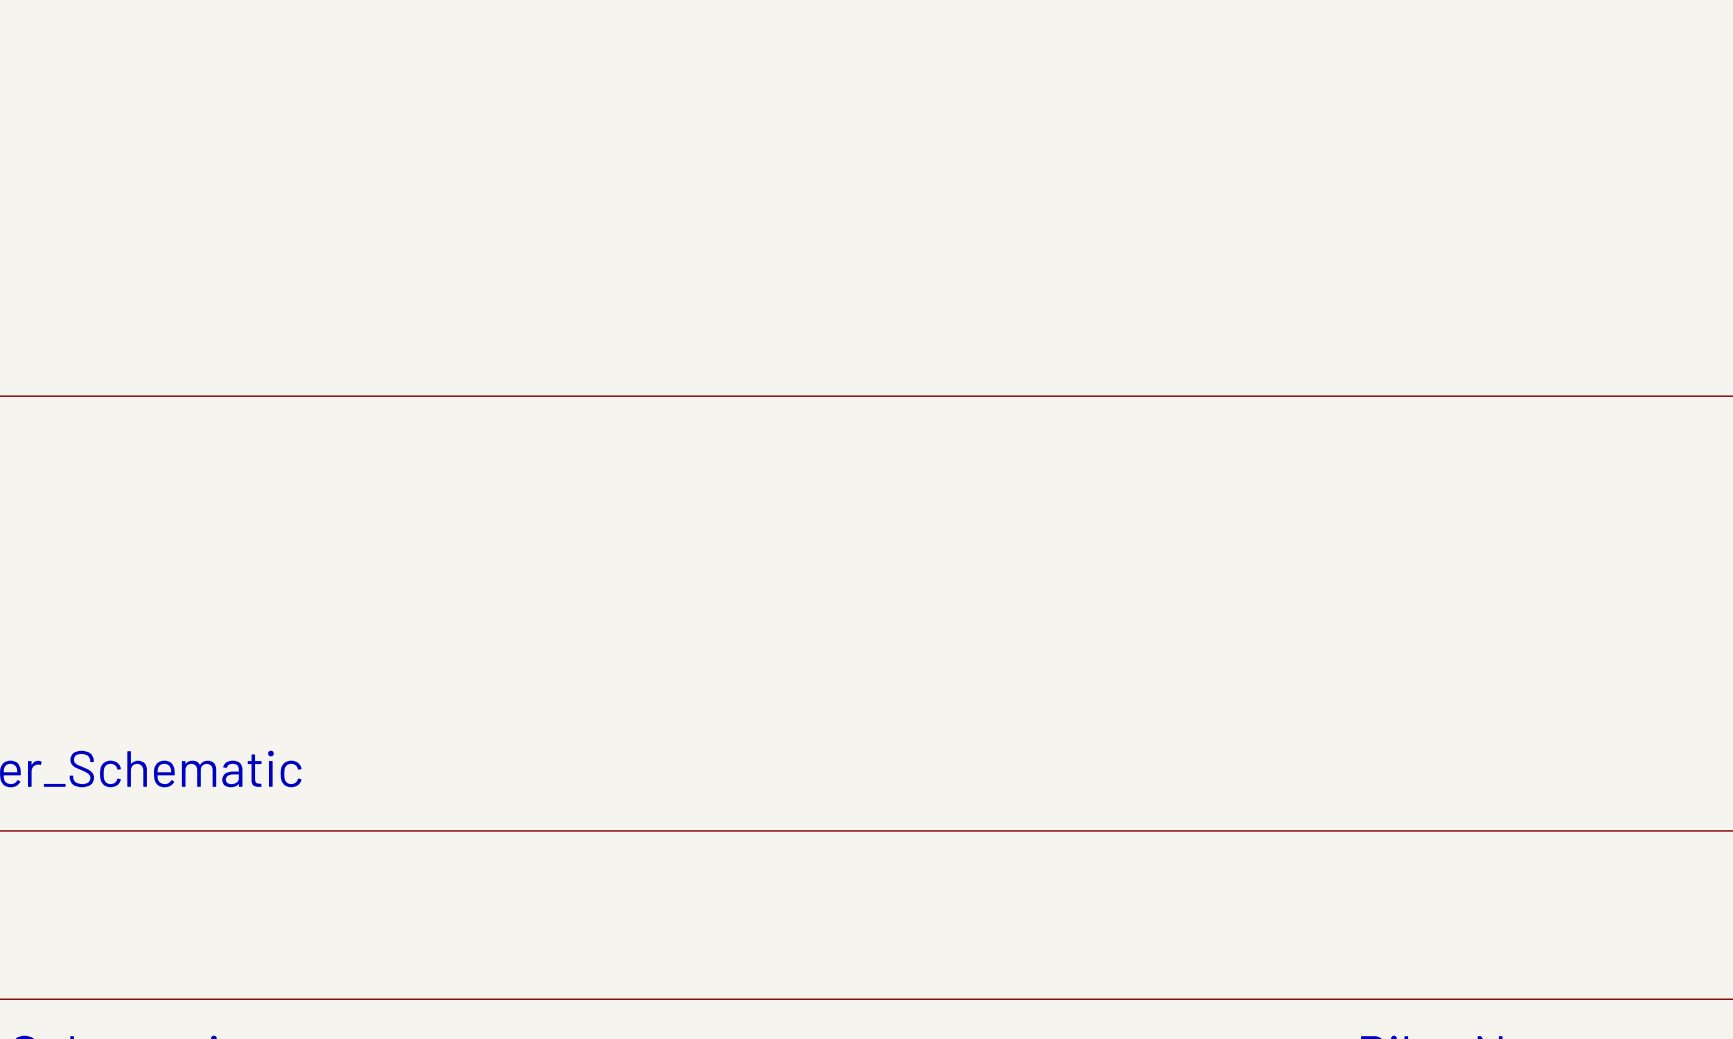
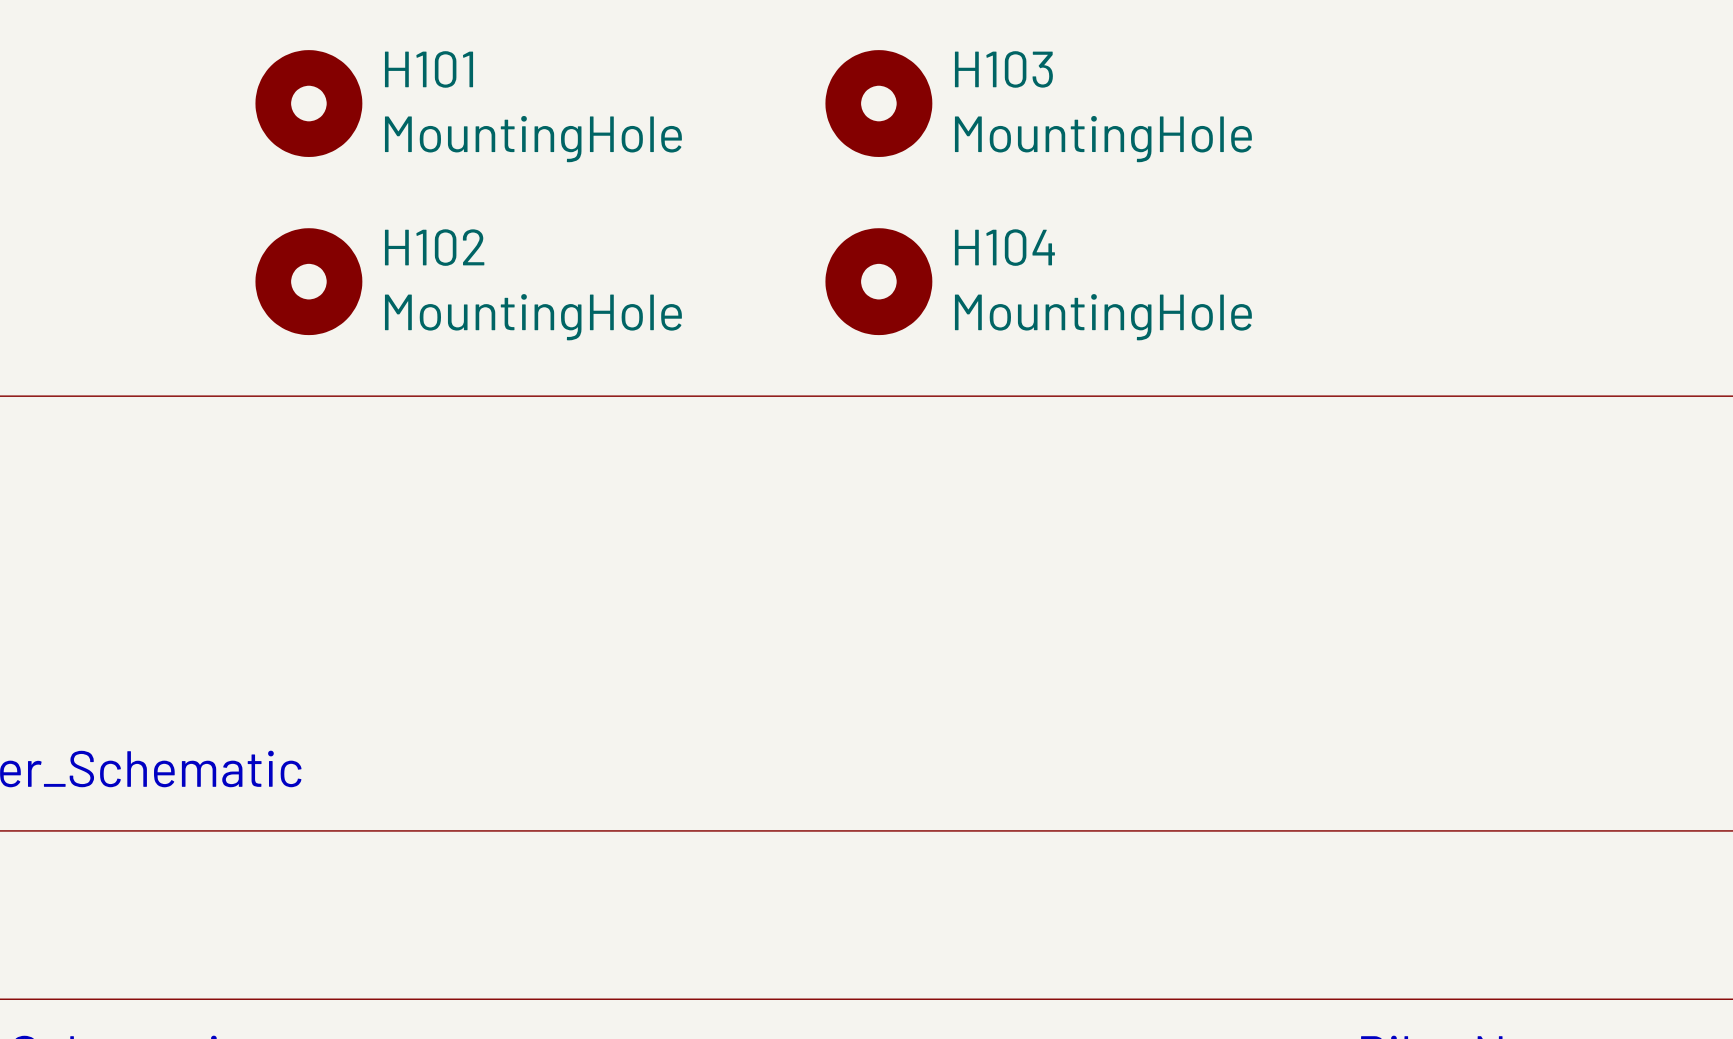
H101: none -> MountingHole (308, 103)
H103: none -> MountingHole (878, 103)
H102: none -> MountingHole (308, 281)
H104: none -> MountingHole (878, 281)

